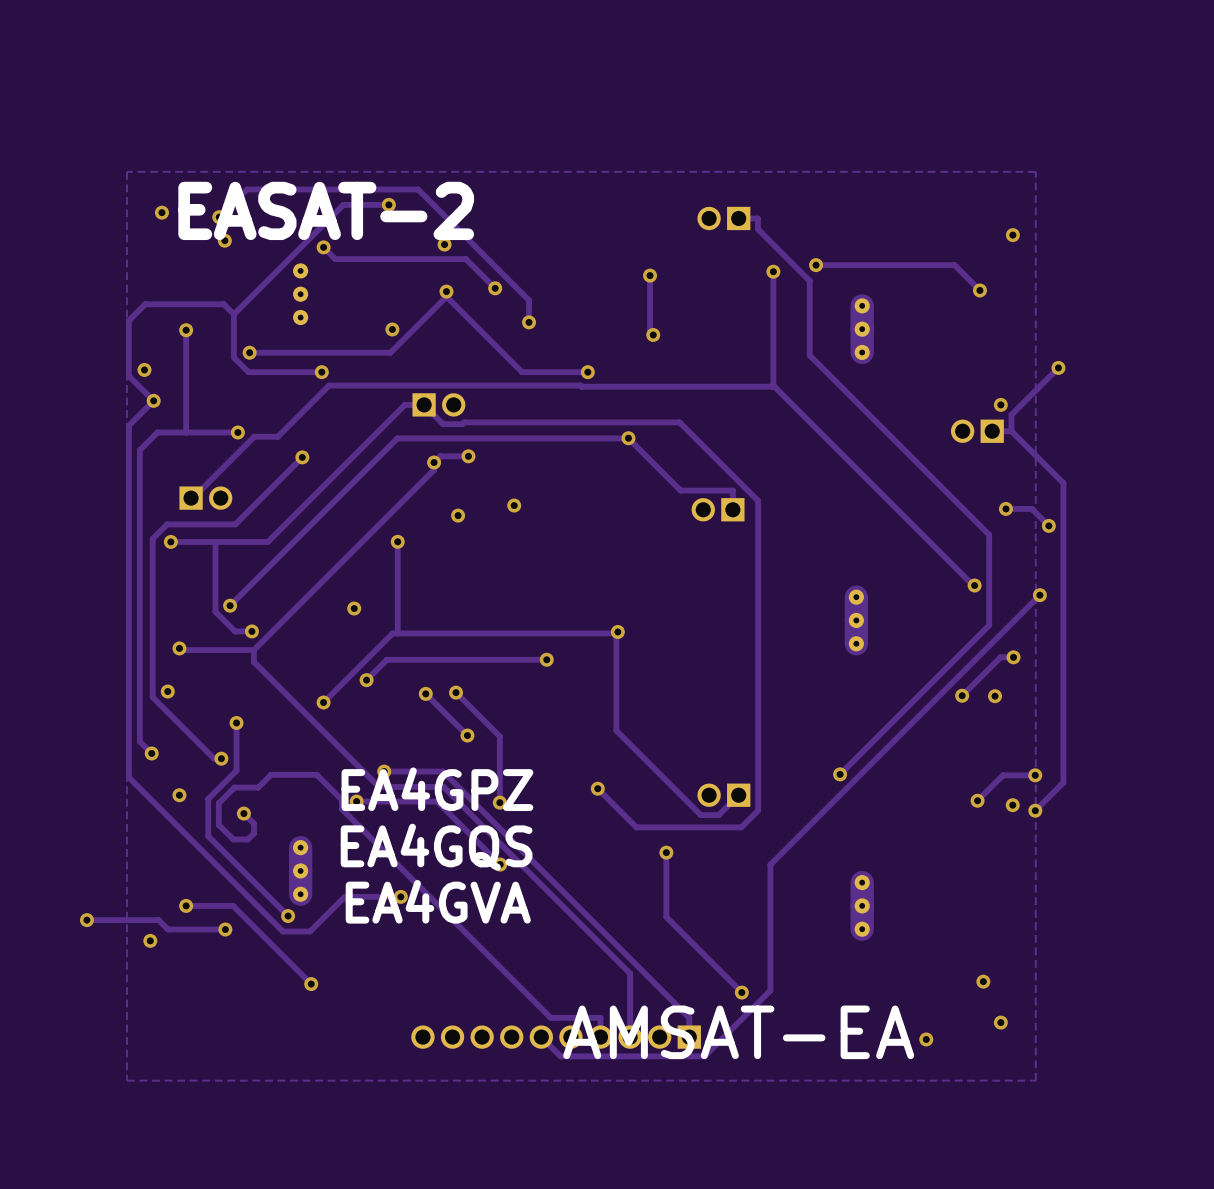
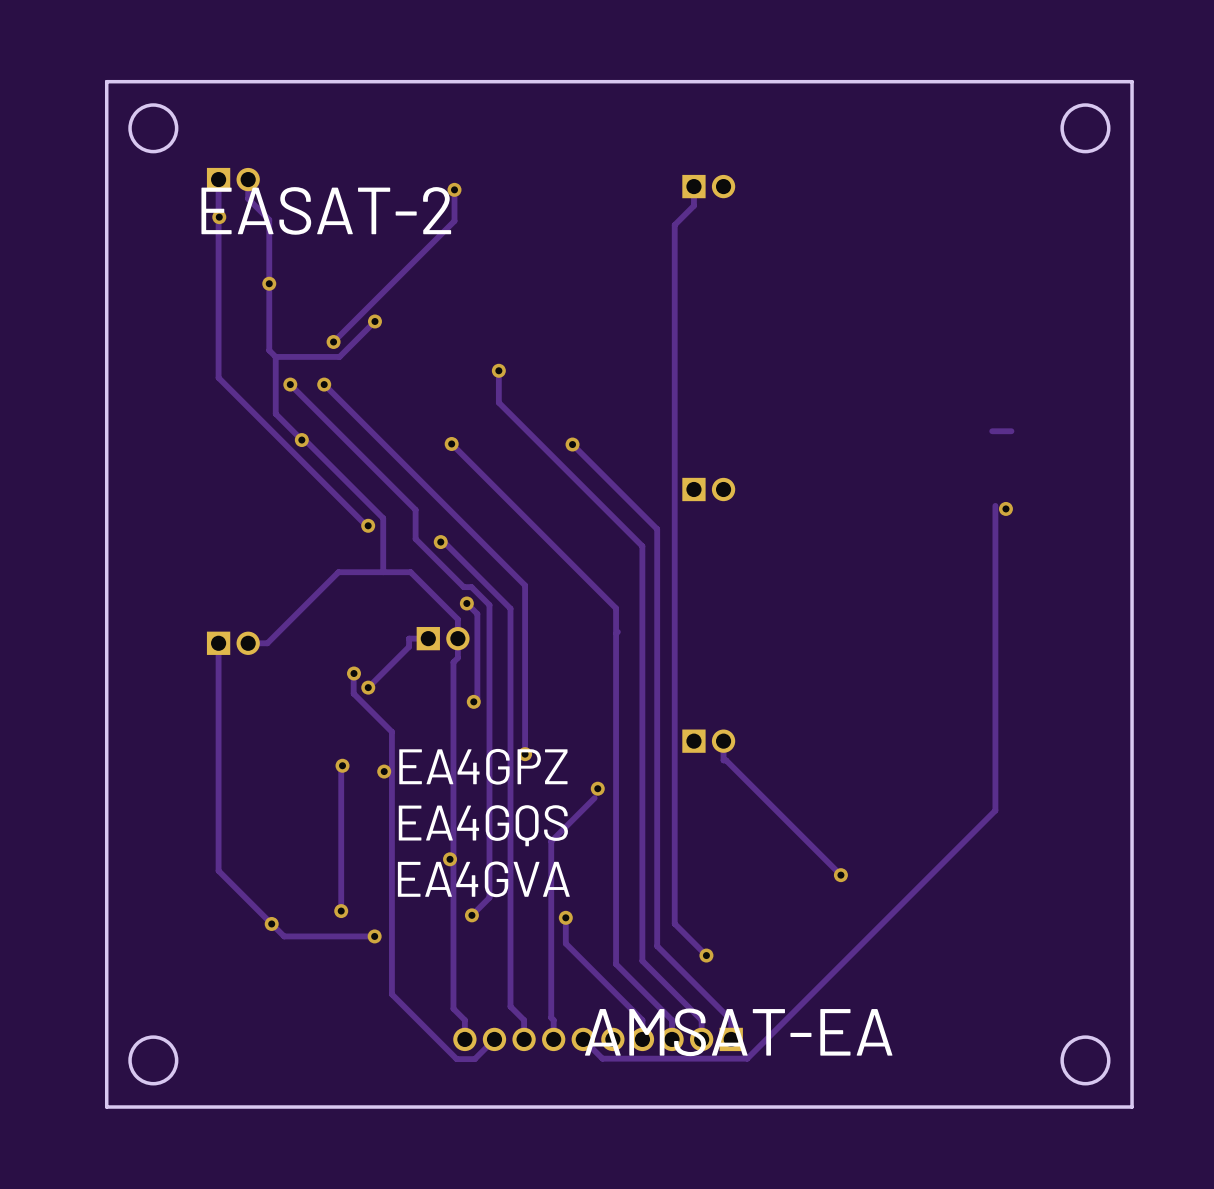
board edge: none -> (1132, 81) (106, 81) (106, 1107) (1132, 1107) (1132, 81)
round board edge: none -> [128, 103, 179, 154]
round board edge: none -> [1060, 103, 1111, 154]
zone outline: (1035, 171) (127, 171) (127, 1080) (1035, 1080) (1035, 171) -> none
track: none -> (218, 179) (218, 377) (368, 525)
part: none -> (233, 179)
track: none -> (248, 179) (248, 198) (269, 219) (269, 350) (275, 356)
track: none -> (693, 186) (693, 205) (674, 225) (674, 923) (706, 955)
track: none -> (454, 189) (454, 221) (333, 341)
via: none -> (454, 189)
track: (388, 204) (343, 204) (233, 314) -> none
via: (388, 204) -> none
via: (161, 212) -> none
track: (219, 217) (246, 189) (418, 189) (529, 300) (529, 322) -> none
part rotation: 0° (723, 218) -> 180° (708, 186)
part position: (723, 218) -> (708, 186)
track: (738, 218) (757, 218) (757, 229) (809, 280) (809, 355) (989, 534) (989, 625) (840, 774) -> none
via: (1012, 235) -> none
via: (224, 240) -> none
via: (444, 244) -> none
track: (323, 247) (335, 259) (465, 259) (495, 288) -> none
via: (323, 247) -> none
track: (816, 265) (954, 265) (979, 290) -> none
via: (816, 265) -> none
track: (773, 271) (773, 385) -> none
via: (773, 271) -> none
track: (650, 275) (650, 331) (653, 335) -> none
via: (650, 275) -> none
via: none -> (269, 283)
via: (495, 288) -> none
via: (979, 290) -> none
via: (446, 291) -> none
part: (300, 294) -> none
track: (446, 296) (522, 372) (587, 372) -> none
track: (446, 296) (390, 352) (249, 352) -> none
track: (862, 305) (862, 352) -> none
track: (233, 314) (233, 357) (248, 372) (321, 372) -> none
track: (233, 314) (223, 304) (145, 304) (128, 320) (128, 375) (153, 400) (128, 425) (128, 777) (282, 931) (310, 931) (344, 896) (400, 896) -> none
track: none -> (374, 321) (339, 356) (275, 356)
via: (529, 322) -> none
via position: (392, 329) -> (374, 321)
part: (862, 329) -> none
track: (186, 330) (186, 432) -> none
via: (186, 330) -> none
via: (653, 335) -> none
via: none -> (333, 341)
via: (249, 352) -> none
track: none -> (275, 356) (275, 413) (301, 440) (304, 440) (383, 518) (383, 572)
track: (1058, 367) (1011, 414) (1011, 431) (1063, 483) (1063, 782) (1035, 810) -> none
via: (1058, 367) -> none
via: (144, 369) -> none
track: none -> (498, 370) (498, 402) (642, 546) (642, 960) (701, 1020) (701, 1039)
via: none -> (498, 370)
via position: (321, 372) -> (324, 384)
via: (587, 372) -> none
track: none -> (290, 384) (415, 509) (415, 538) (463, 587) (471, 587) (489, 605) (489, 897) (471, 915)
via: none -> (290, 384)
track: none -> (324, 384) (525, 585) (525, 754)
track: (773, 385) (974, 585) -> none
track: (773, 385) (329, 385) (277, 436) (254, 436) (191, 498) -> none
via: (153, 400) -> none
track: (423, 404) (443, 424) (462, 424) (464, 422) (679, 422) (758, 500) (758, 810) (741, 827) (636, 827) (597, 788) -> none
track: (424, 404) (404, 404) (267, 541) (170, 541) -> none
part: (438, 404) -> none
via: (1000, 404) -> none
part: (977, 431) -> none
track: (237, 432) (157, 432) (139, 450) (139, 741) (151, 753) -> none
via: (237, 432) -> none
via: (628, 438) -> none
track: none -> (451, 443) (616, 608) (616, 964) (672, 1020) (672, 1039)
via: none -> (451, 443)
track: none -> (572, 444) (657, 529) (657, 946) (731, 1020) (731, 1039)
via: none -> (572, 444)
track: (468, 456) (440, 456) (434, 462) (434, 469) (253, 650) -> none
via: (468, 456) -> none
track: (302, 457) (235, 524) (167, 524) (152, 538) (152, 697) (214, 758) (221, 758) -> none
via position: (302, 457) -> (301, 440)
via: (434, 462) -> none
part: (205, 498) -> none
via: (514, 505) -> none
track: none -> (995, 505) (995, 810) (747, 1058) (602, 1058) (583, 1039)
track: (1005, 508) (1031, 508) (1048, 525) -> none
part rotation: 0° (718, 509) -> 180° (708, 489)
track: (732, 509) (732, 490) (680, 490) (628, 438) (397, 438) (230, 605) -> none
via: (458, 515) -> none
via: none -> (368, 525)
via: (1048, 525) -> none
via: (170, 541) -> none
track: (215, 541) (215, 611) (235, 631) (251, 631) -> none
track: (397, 541) (397, 633) -> none
via: (397, 541) -> none
track: none -> (440, 542) (443, 542) (510, 608) (510, 1006) (524, 1020) (524, 1039)
via: none -> (440, 542)
via: (974, 585) -> none
track: (1039, 595) (770, 864) (770, 990) (704, 1056) (560, 1056) (541, 1037) -> none
via: (1039, 595) -> none
track: (856, 597) (856, 643) -> none
track: none -> (466, 603) (477, 613) (477, 698) (473, 701)
via: none -> (466, 603)
via: (230, 605) -> none
via: (354, 608) -> none
part: (856, 620) -> none
via: (251, 631) -> none
via: (617, 631) -> none
track: none -> (428, 638) (409, 638) (409, 646) (368, 687)
part: none -> (443, 638)
track: none -> (218, 643) (218, 870) (284, 936) (374, 936)
part: none -> (233, 643)
track: none -> (248, 643) (267, 643) (338, 572) (410, 572) (457, 619) (457, 657) (453, 662) (453, 1008) (464, 1020) (464, 1039)
track: (179, 648) (181, 650) (253, 650) -> none
via: (179, 648) -> none
track: (253, 650) (253, 661) (378, 786) (443, 786) (630, 973) (630, 1037) -> none
track: (1013, 657) (1000, 657) (962, 695) -> none
via: (1013, 657) -> none
track: (546, 659) (386, 659) (366, 680) -> none
via: (546, 659) -> none
track: none -> (353, 673) (353, 693) (391, 731) (391, 994) (456, 1059) (474, 1059) (494, 1039)
via: none -> (353, 673)
via: (366, 680) -> none
via: none -> (368, 687)
via: (167, 691) -> none
track: (456, 692) (499, 736) (499, 802) -> none
via: (456, 692) -> none
track: (425, 693) (467, 735) -> none
via: (425, 693) -> none
via: (962, 695) -> none
via: (995, 696) -> none
via: none -> (473, 701)
track: (323, 702) (392, 633) (616, 633) (616, 730) (700, 815) (718, 815) (738, 795) -> none
via: (323, 702) -> none
track: (236, 722) (236, 770) (208, 798) (208, 836) (288, 916) -> none
via: (236, 722) -> none
via: (467, 735) -> none
track: none -> (723, 741) (723, 760) (726, 760) (840, 875)
via: (151, 753) -> none
via: none -> (525, 754)
via: (221, 758) -> none
track: none -> (342, 765) (341, 911)
via: none -> (342, 765)
track: (384, 771) (442, 771) (689, 1017) (689, 1037) -> none
via: (840, 774) -> none
track: (1035, 775) (1002, 775) (977, 800) -> none
via: (1035, 775) -> none
text position: EA4GPZ (437, 789) -> EA4GPZ (483, 766)
via: (179, 795) -> none
part rotation: 0° (723, 795) -> 180° (708, 741)
part position: (723, 795) -> (708, 741)
track: none -> (594, 798) (551, 841) (551, 1017) (553, 1020) (553, 1039)
via: (977, 800) -> none
track: (356, 801) (437, 801) (500, 864) -> none
via: (356, 801) -> none
via: (499, 802) -> none
via: (1012, 805) -> none
via: (1035, 810) -> none
track: (243, 813) (254, 823) (254, 833) (247, 839) (233, 839) (218, 824) (218, 803) (234, 787) (258, 787) (271, 774) (316, 774) (341, 799) (341, 809) (550, 1017) (600, 1017) (600, 1037) -> none
via: (243, 813) -> none
track: (300, 847) (300, 894) -> none
text position: EA4GQS (436, 847) -> EA4GQS (483, 825)
track: (666, 852) (666, 917) (741, 992) -> none
via: (666, 852) -> none
via: none -> (450, 859)
via: (500, 864) -> none
part: (300, 870) -> none
via: none -> (840, 875)
track: (862, 882) (862, 929) -> none
via: (400, 896) -> none
text position: EA4GVA (438, 901) -> EA4GVA (483, 879)
track: (186, 905) (233, 905) (311, 984) -> none
via: (186, 905) -> none
part: (862, 905) -> none
via: none -> (341, 911)
via: none -> (471, 915)
via position: (288, 916) -> (271, 923)
track: none -> (565, 917) (565, 943) (642, 1020) (642, 1039)
via: none -> (565, 917)
track: (86, 920) (158, 920) (168, 929) (225, 929) -> none
via: (86, 920) -> none
via: (225, 929) -> none
via: none -> (374, 936)
via: (150, 940) -> none
via: (983, 981) -> none
via: (311, 984) -> none
via position: (741, 992) -> (706, 955)
via: (1000, 1022) -> none
round board edge: none -> [128, 1035, 179, 1086]
round board edge: none -> [1060, 1035, 1111, 1086]
part position: (556, 1037) -> (598, 1039)
via: (926, 1039) -> none

